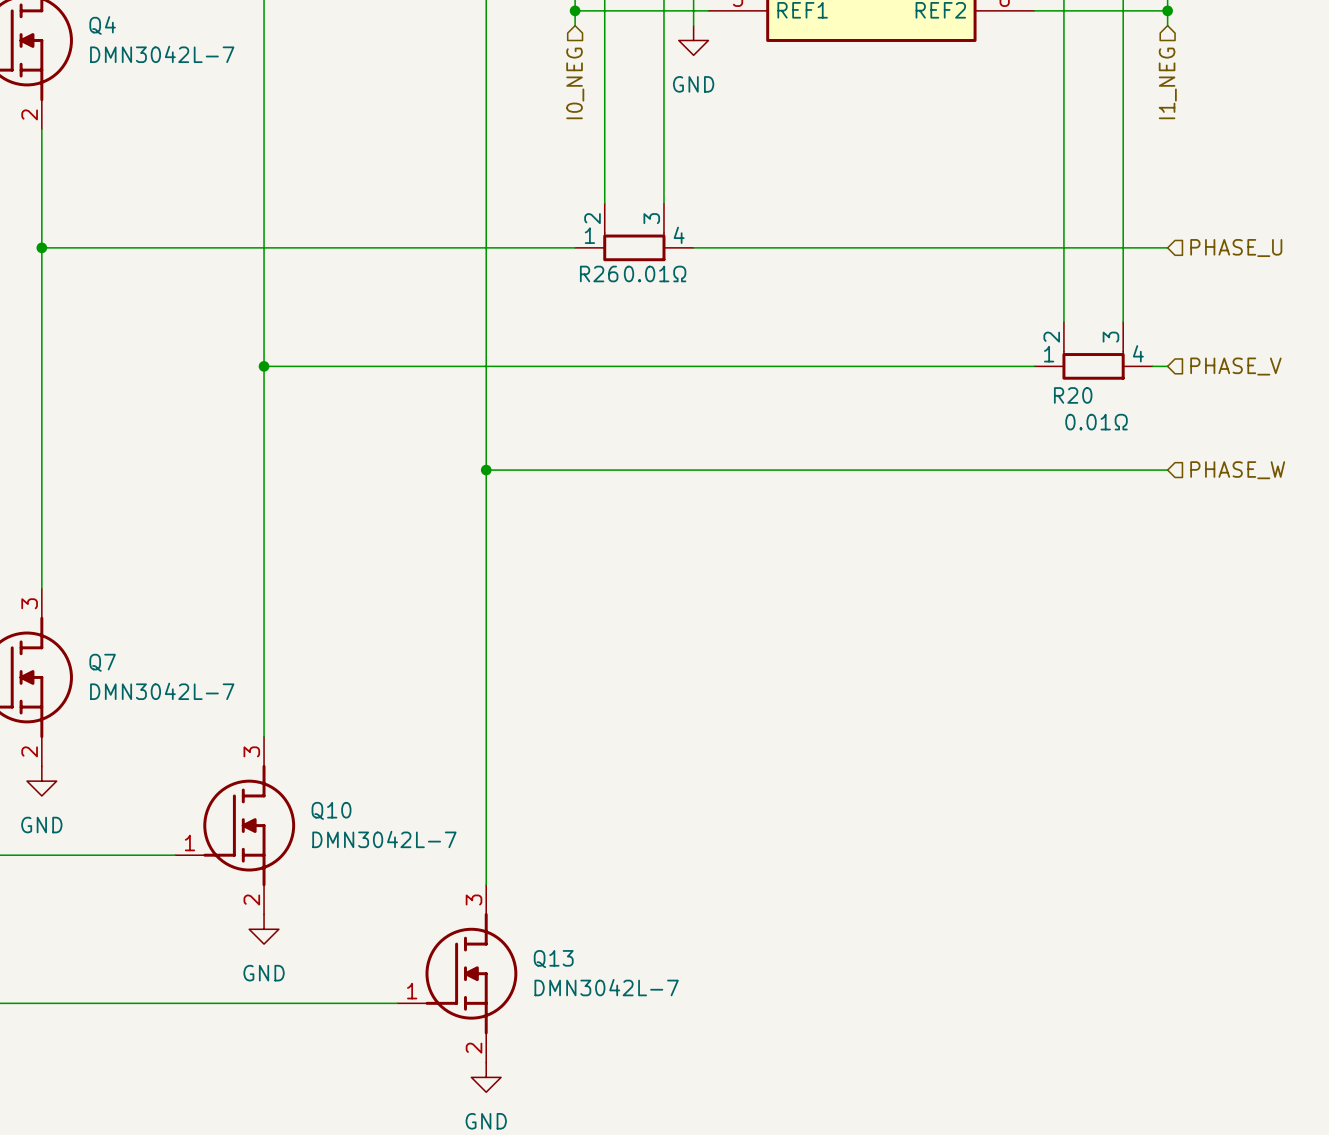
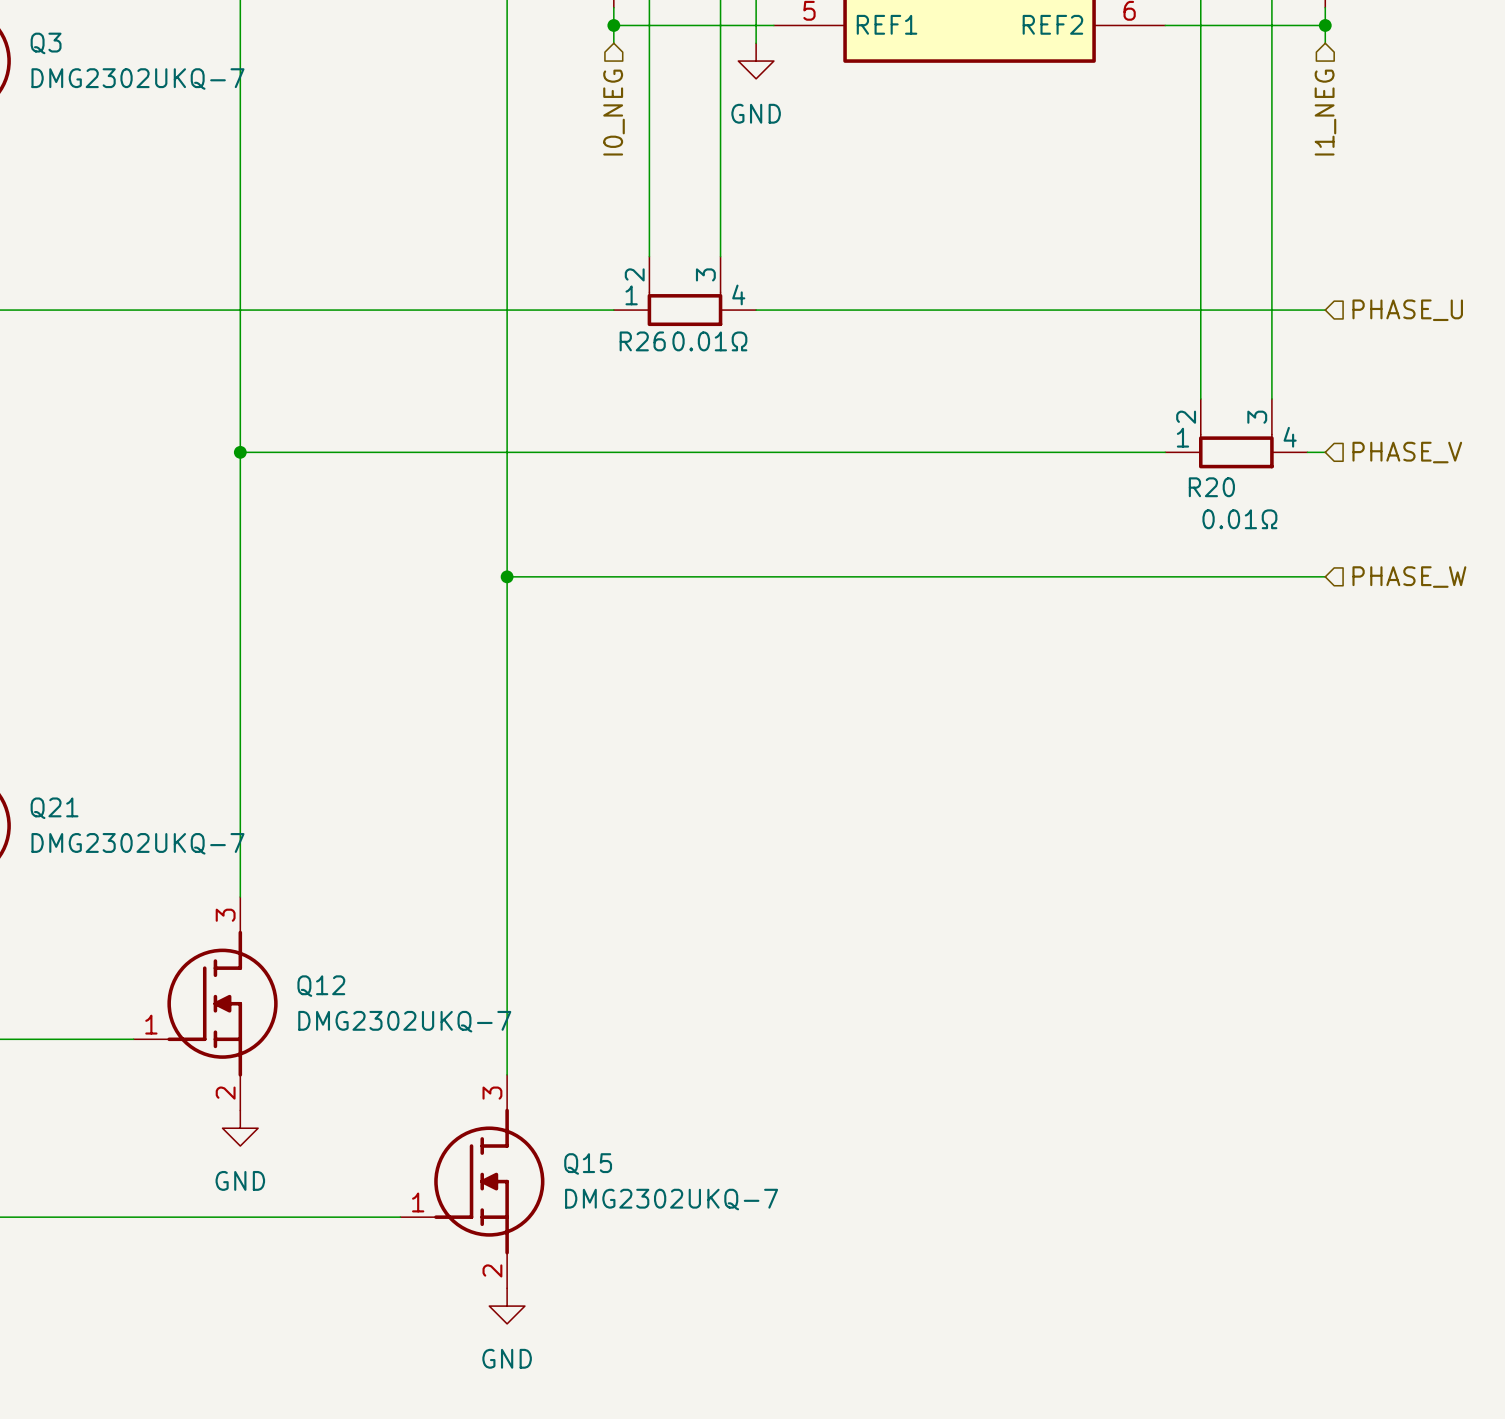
Q4 name: Q4 (102, 25) -> Q3 (46, 43)
Q4 value: DMN3042L-7 (162, 54) -> DMG2302UKQ-7 (137, 79)
Q7 name: Q7 (102, 662) -> Q21 (54, 808)
Q7 value: DMN3042L-7 (162, 691) -> DMG2302UKQ-7 (137, 843)
Q10 name: Q10 (331, 810) -> Q12 (321, 986)
Q10 value: DMN3042L-7 (384, 839) -> DMG2302UKQ-7 (404, 1021)
Q13 name: Q13 (553, 959) -> Q15 (588, 1163)
Q13 value: DMN3042L-7 (606, 987) -> DMG2302UKQ-7 (671, 1199)

